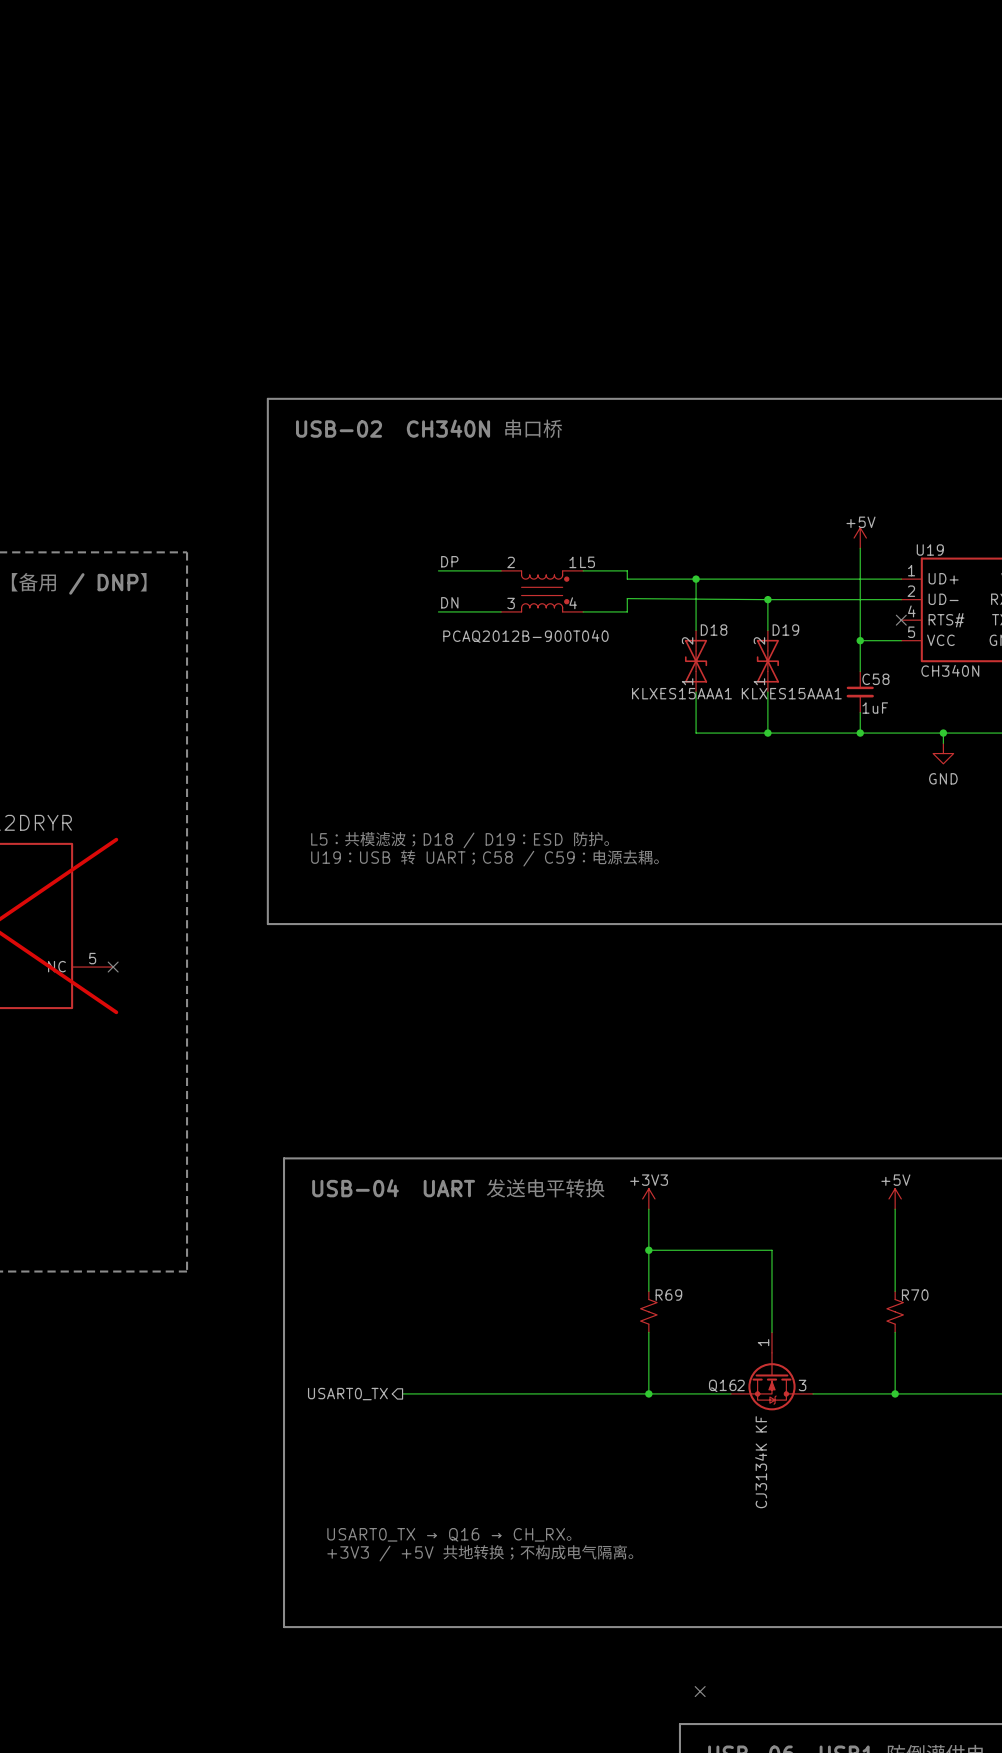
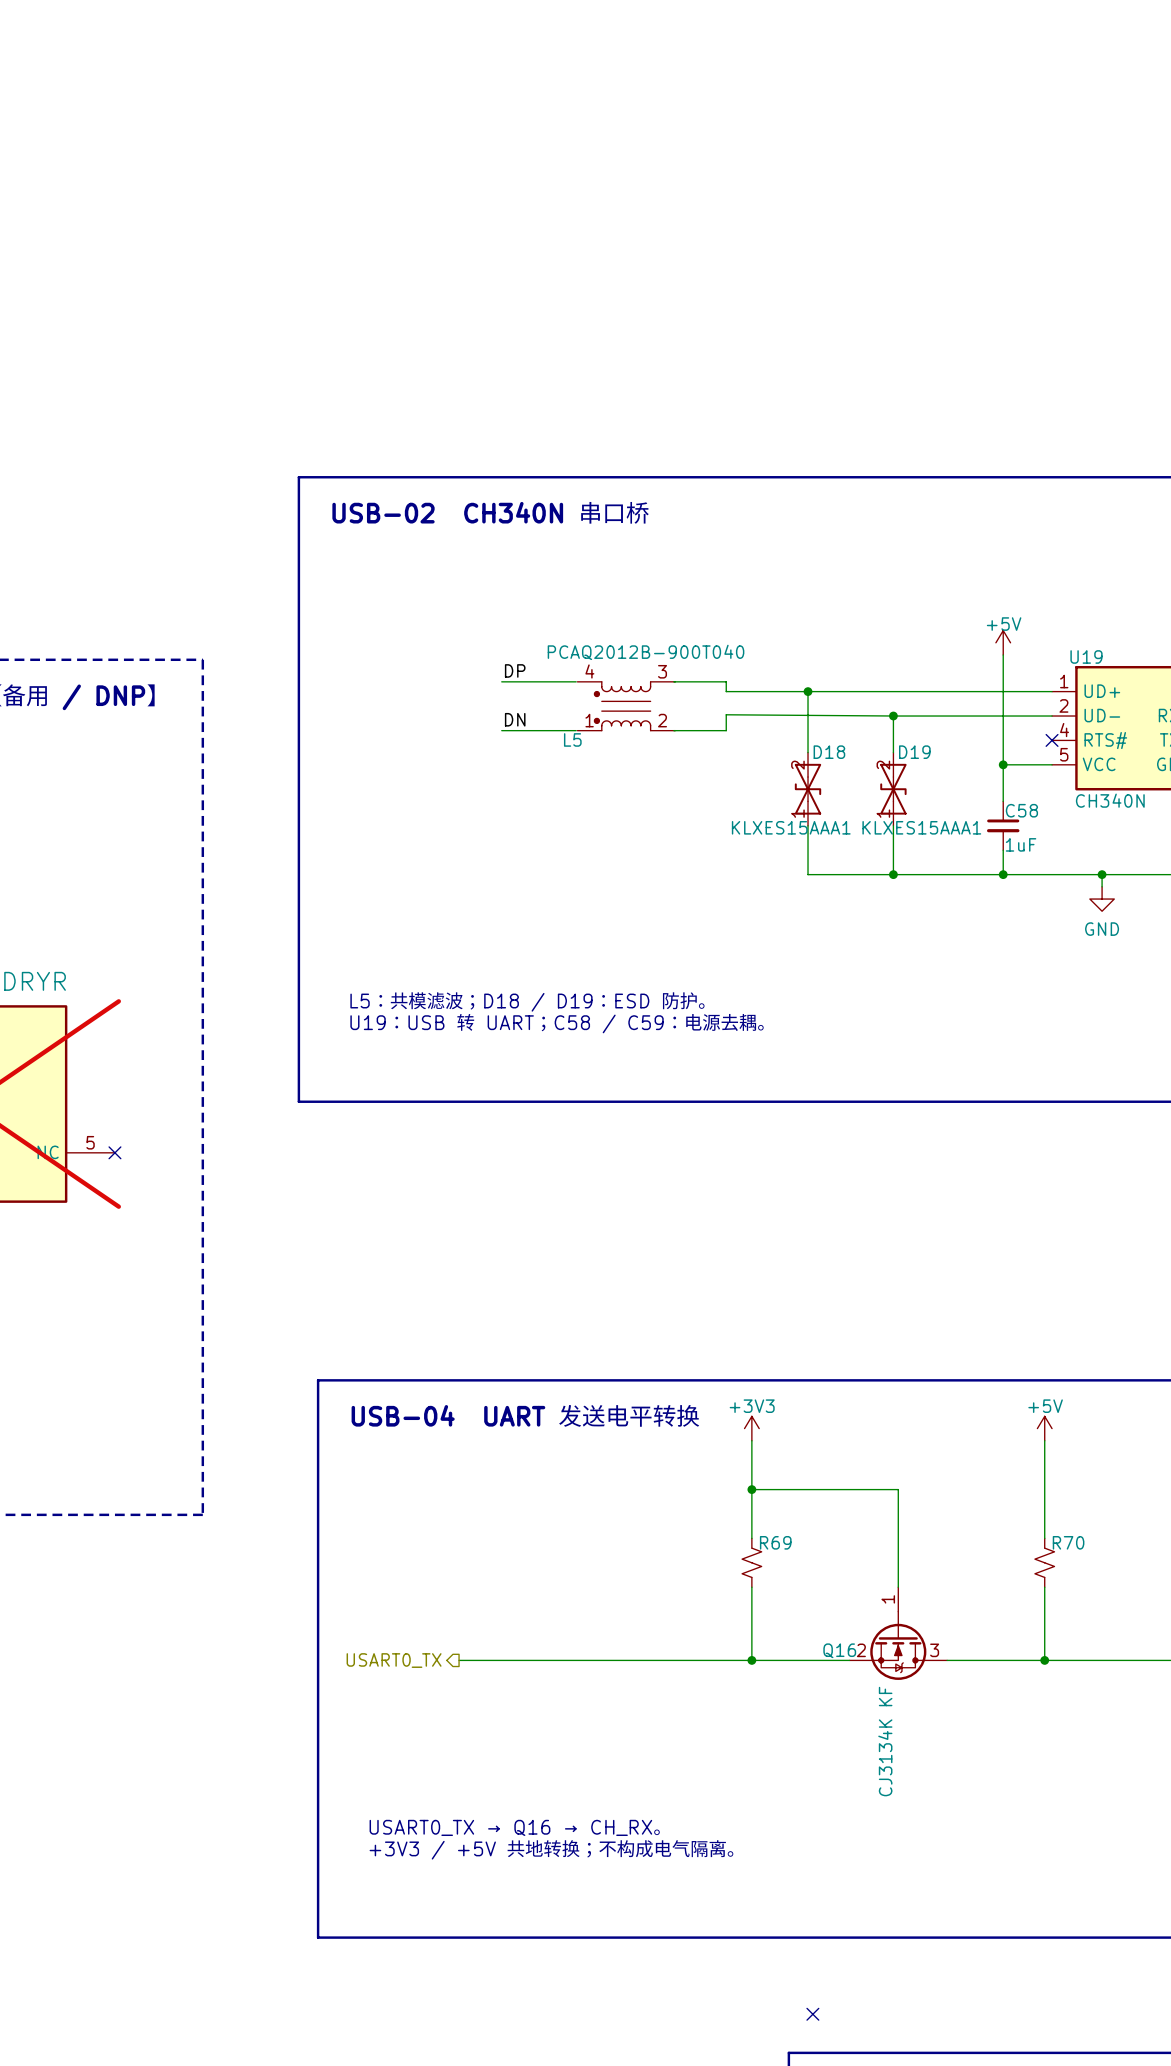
L5 rotation: 0° (545, 591) -> 180° (622, 706)

